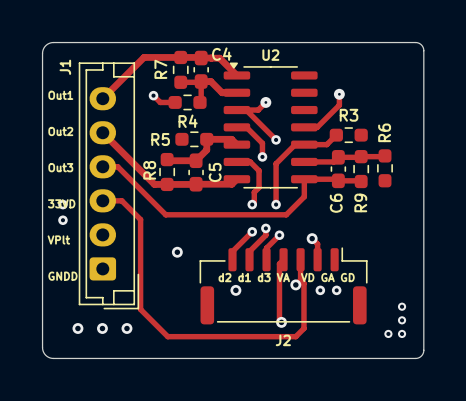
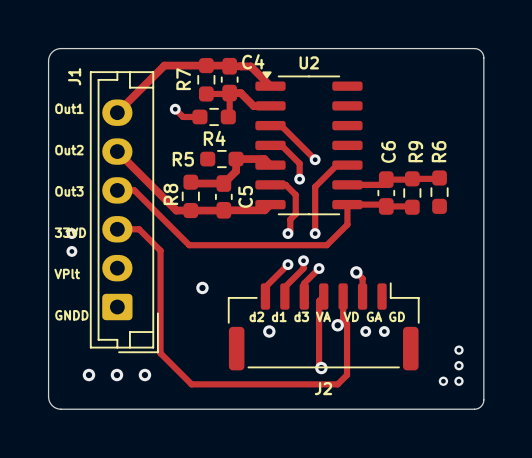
track: (339, 94) (339, 105) (317, 127) (304, 127) -> none
via: (339, 94) -> none
track: (265, 102) (258, 110) (246, 110) -> none
via: (265, 102) -> none
track: (336, 135) (326, 144) (304, 144) -> none
R3: (348, 135) -> none
R9 name position: R9 (360, 202) -> R9 (415, 151)
C6 name position: C6 (336, 203) -> C6 (388, 151)

